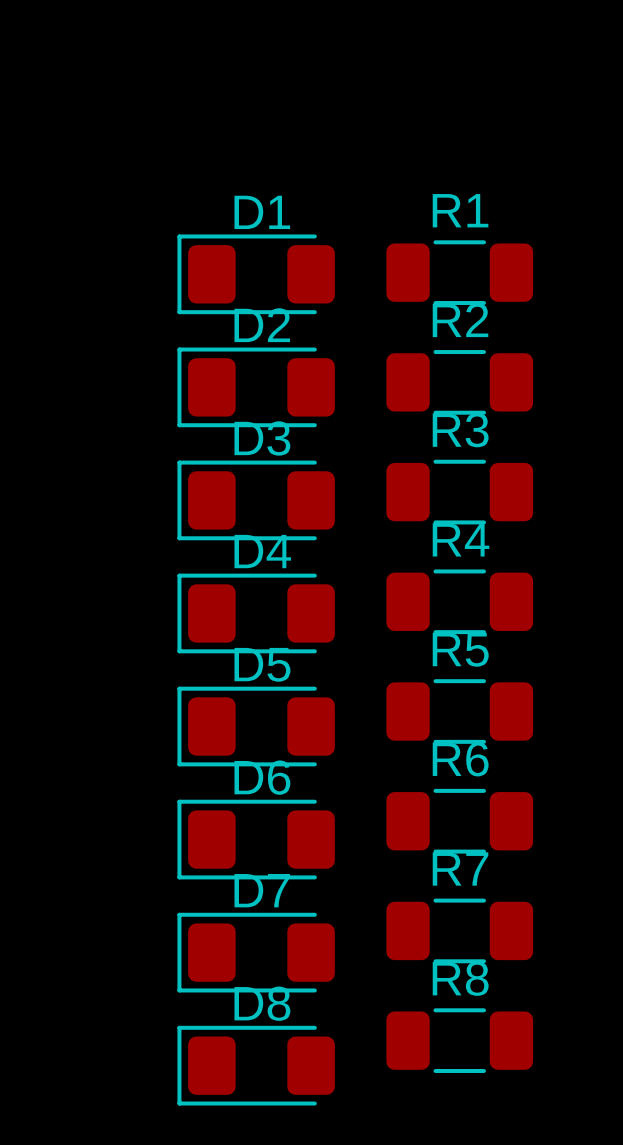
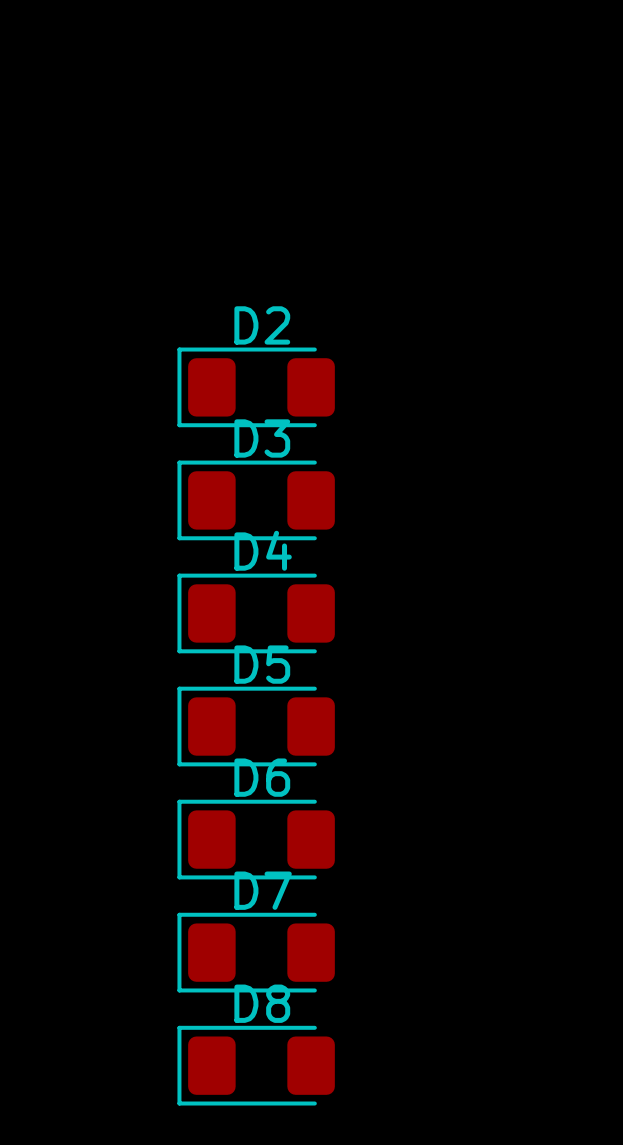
R1: (459, 272) -> none
D1: (256, 274) -> none
R2: (459, 382) -> none
R3: (459, 492) -> none
R4: (459, 601) -> none
R5: (459, 711) -> none
R6: (459, 821) -> none
R7: (459, 930) -> none
R8: (459, 1040) -> none

